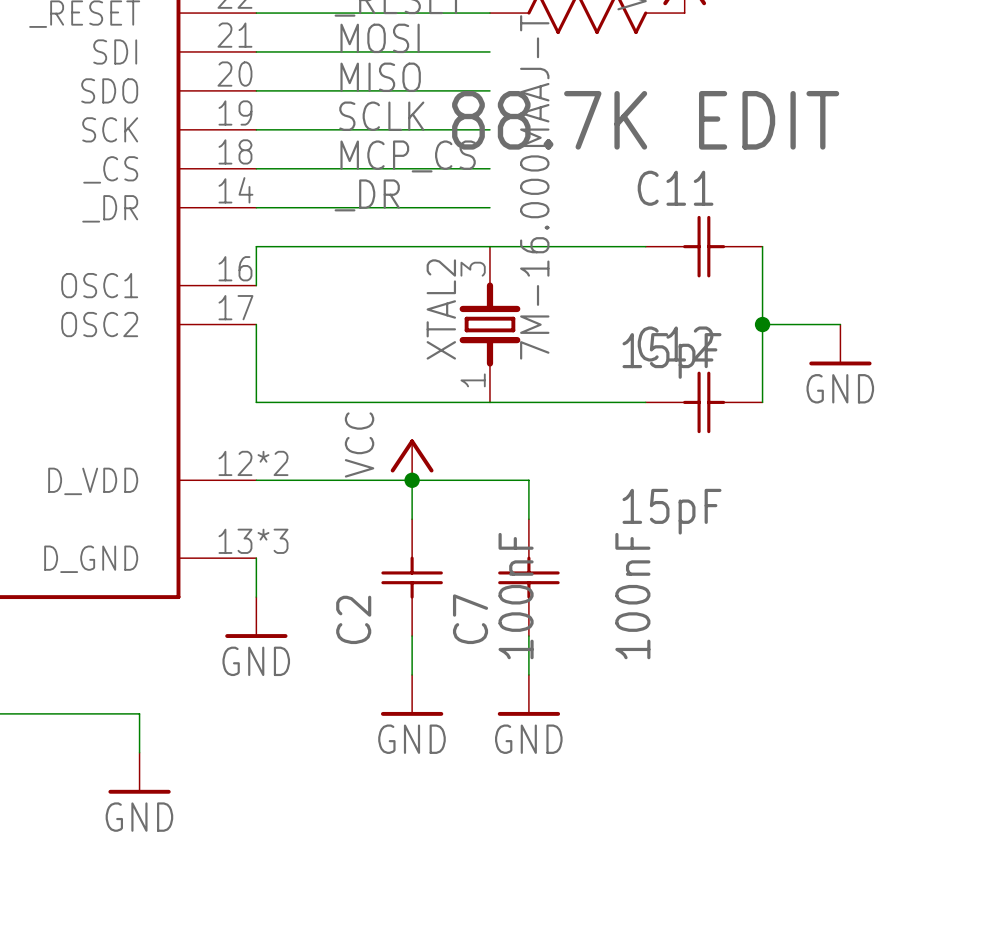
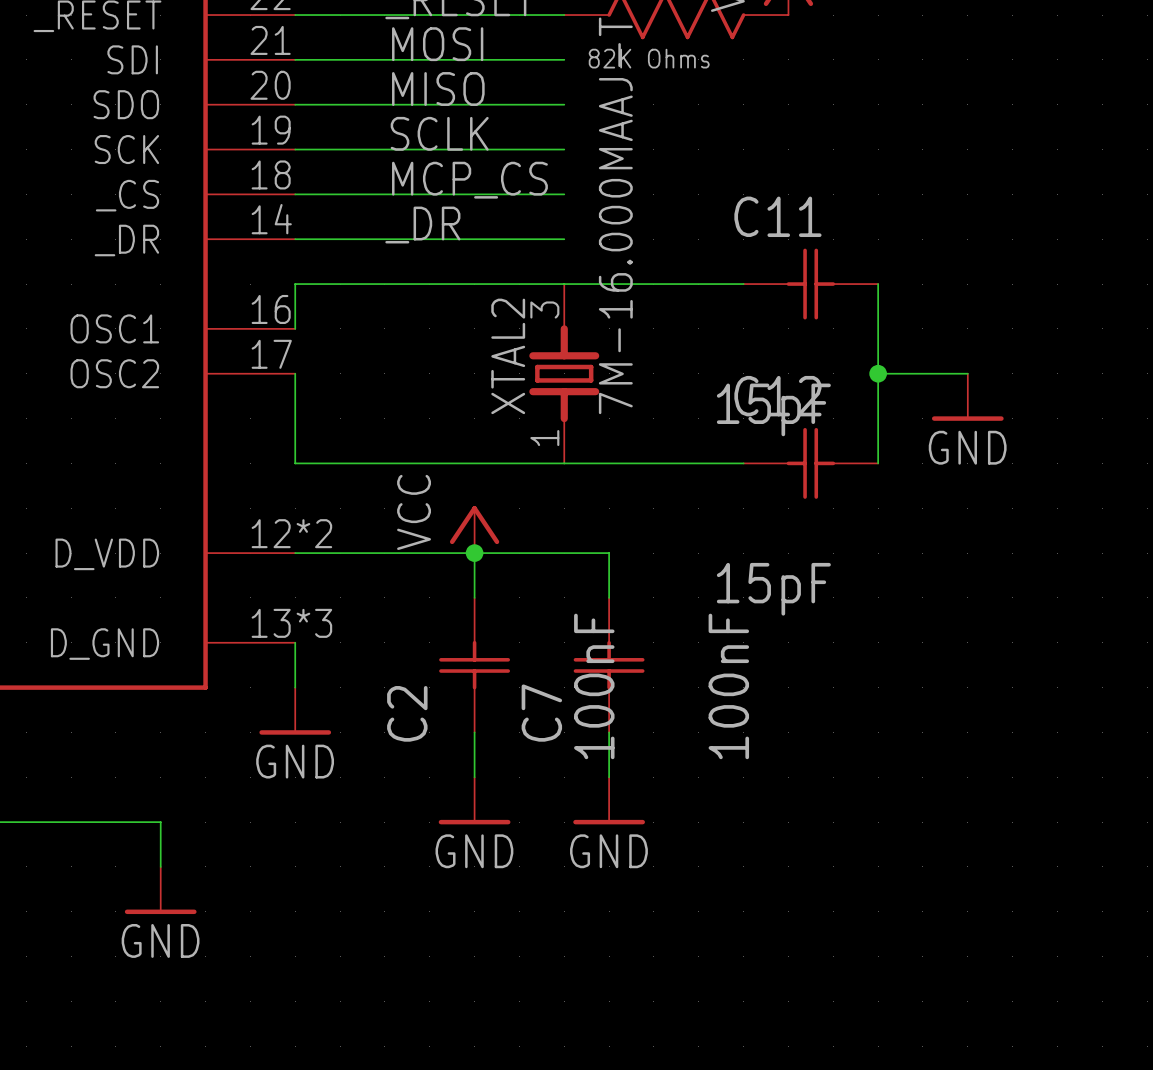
part value: 88.7K EDIT (645, 120) -> 82K Ohms (649, 58)

